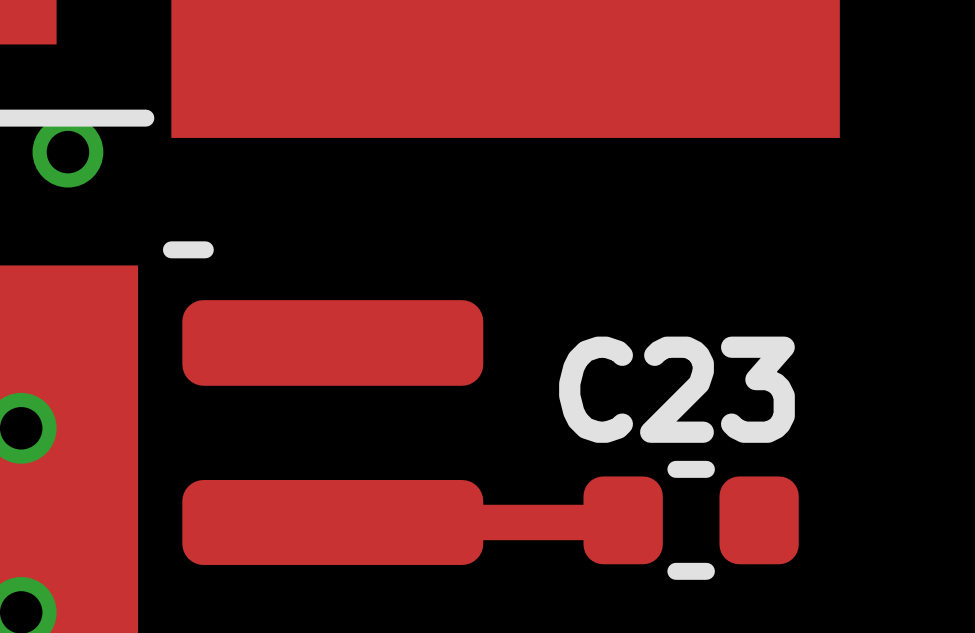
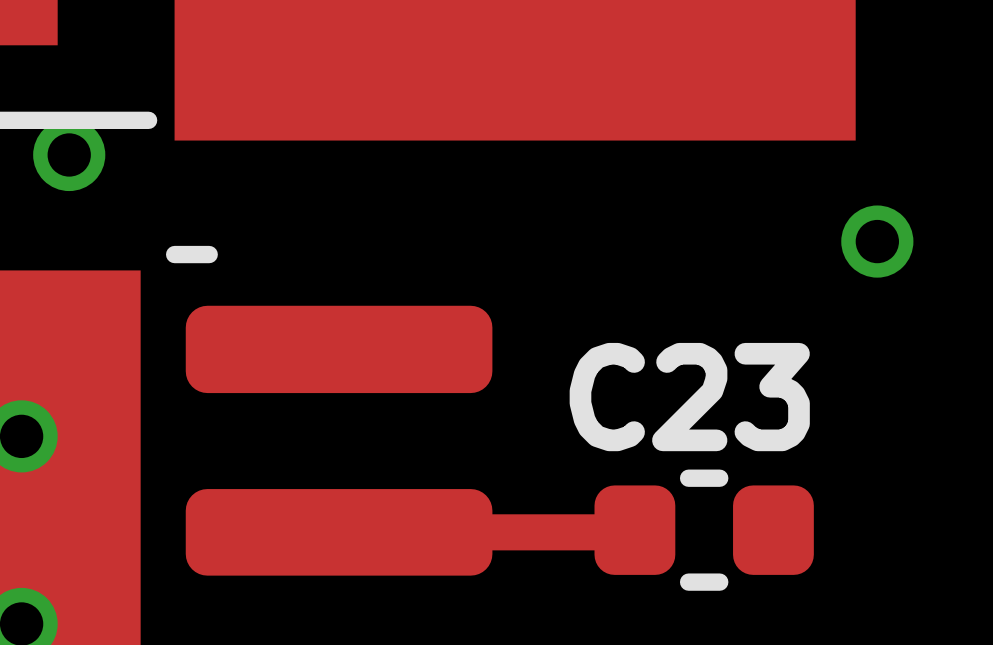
via: none -> (877, 241)

